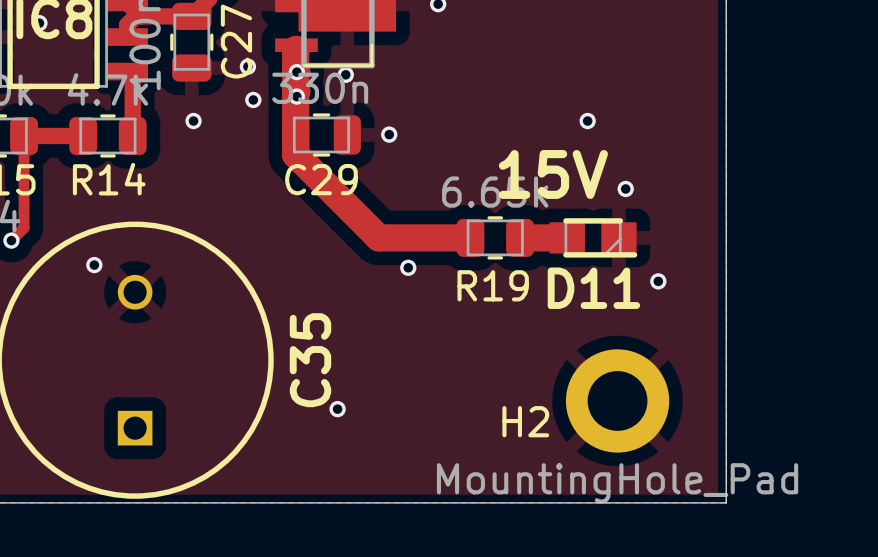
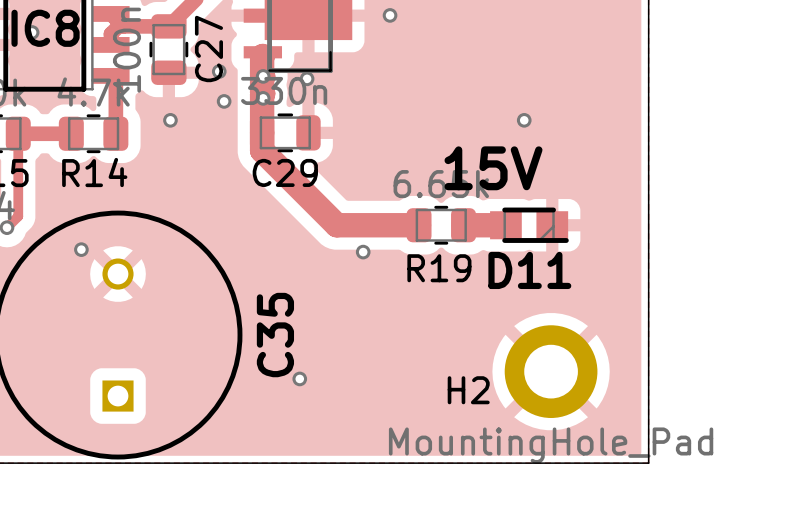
via: (389, 134) -> none
via: (625, 188) -> none
via: (658, 281) -> none

